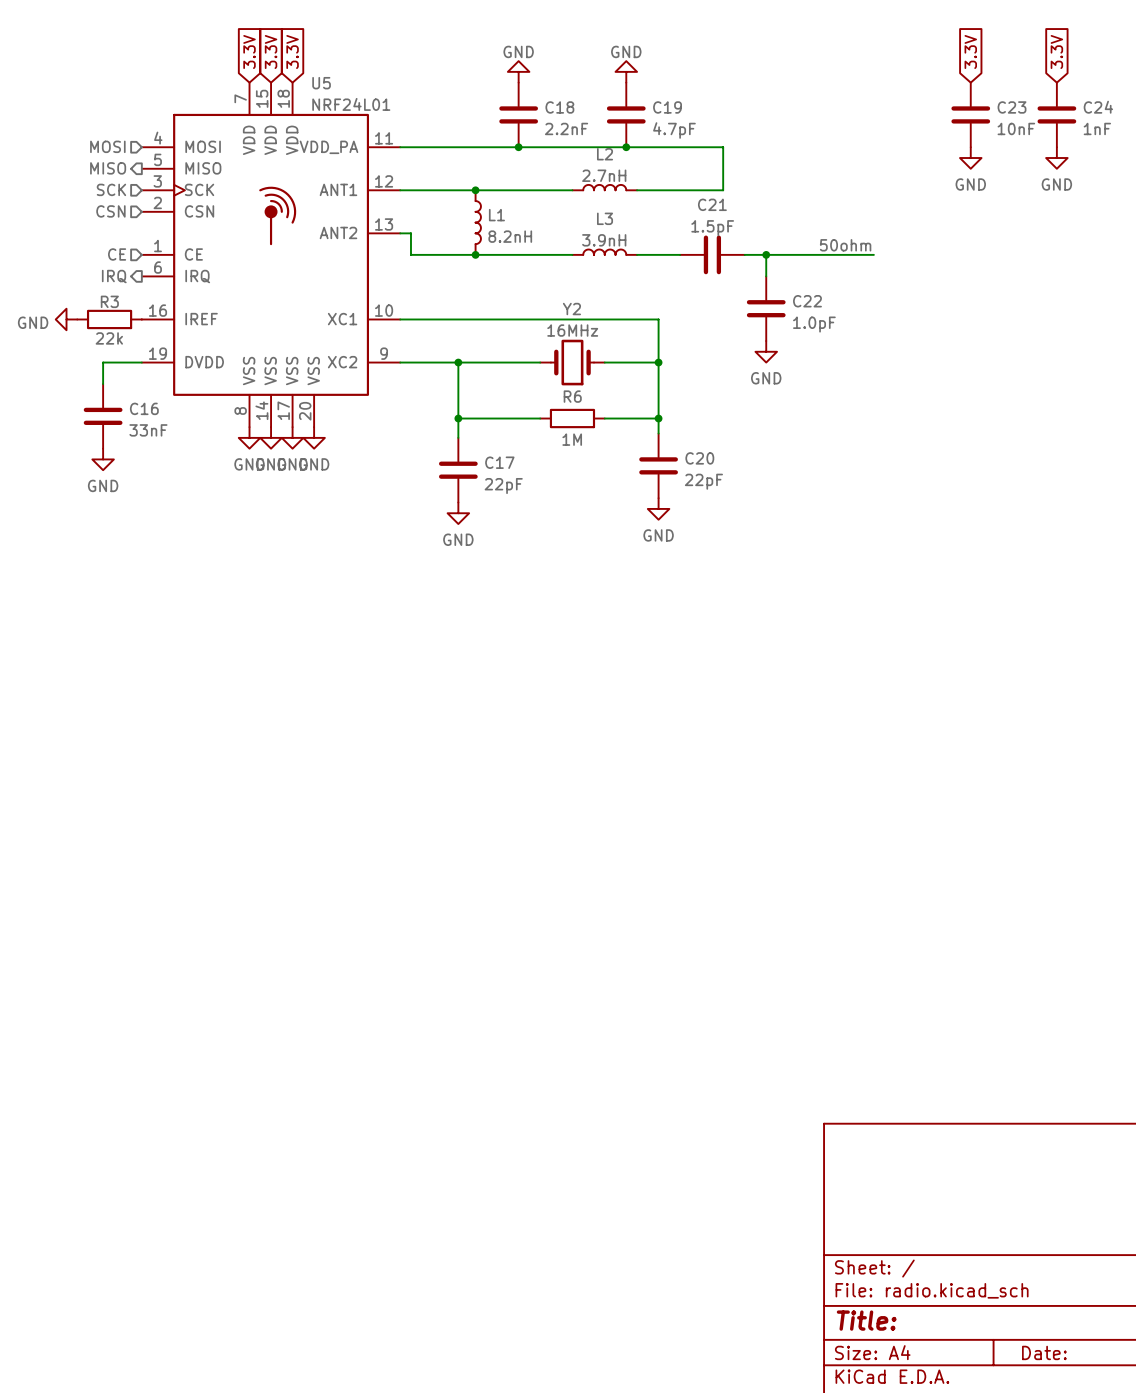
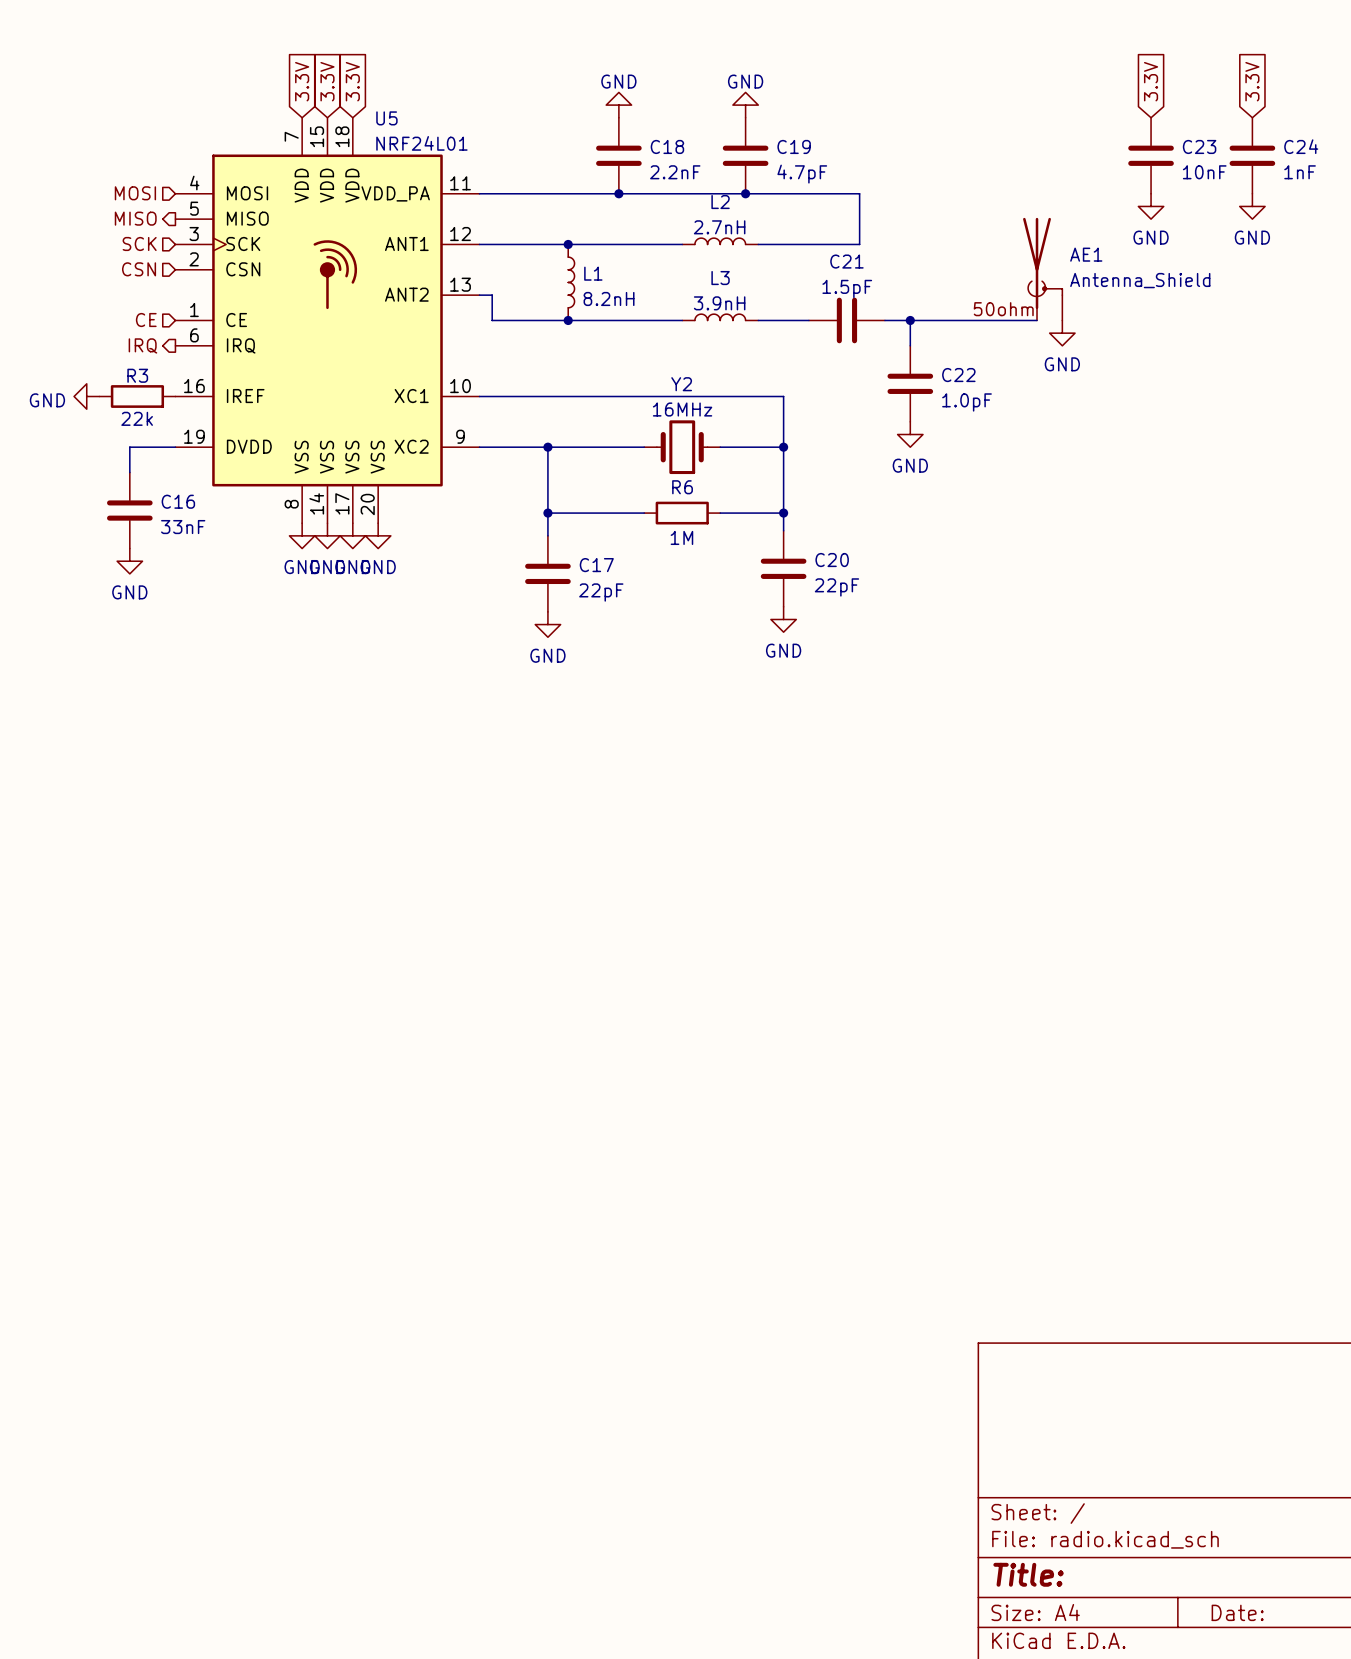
AE1: none -> Antenna_Shield (1042, 269)
power symbol: none -> GND (1062, 333)

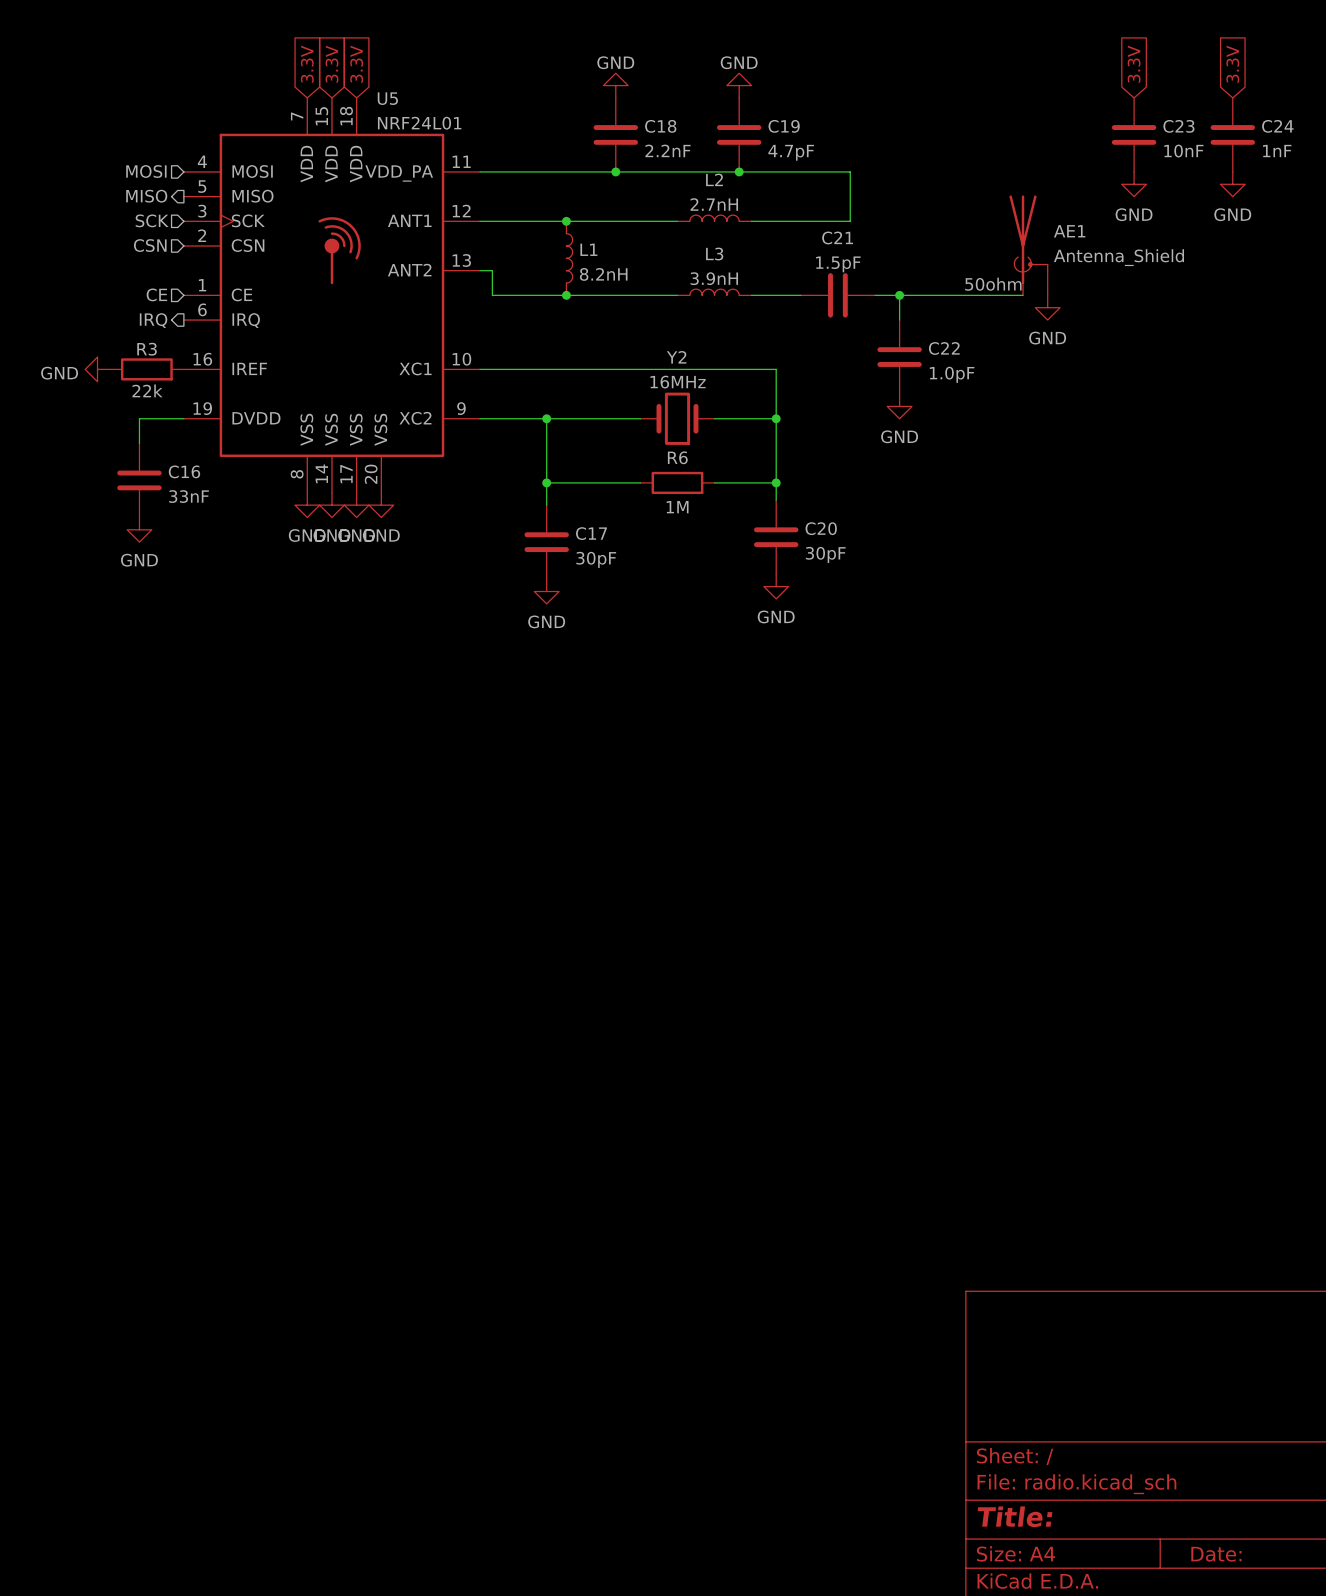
C20 value: 22pF (836, 587) -> 30pF (825, 554)
C17 value: 22pF (601, 592) -> 30pF (596, 559)

